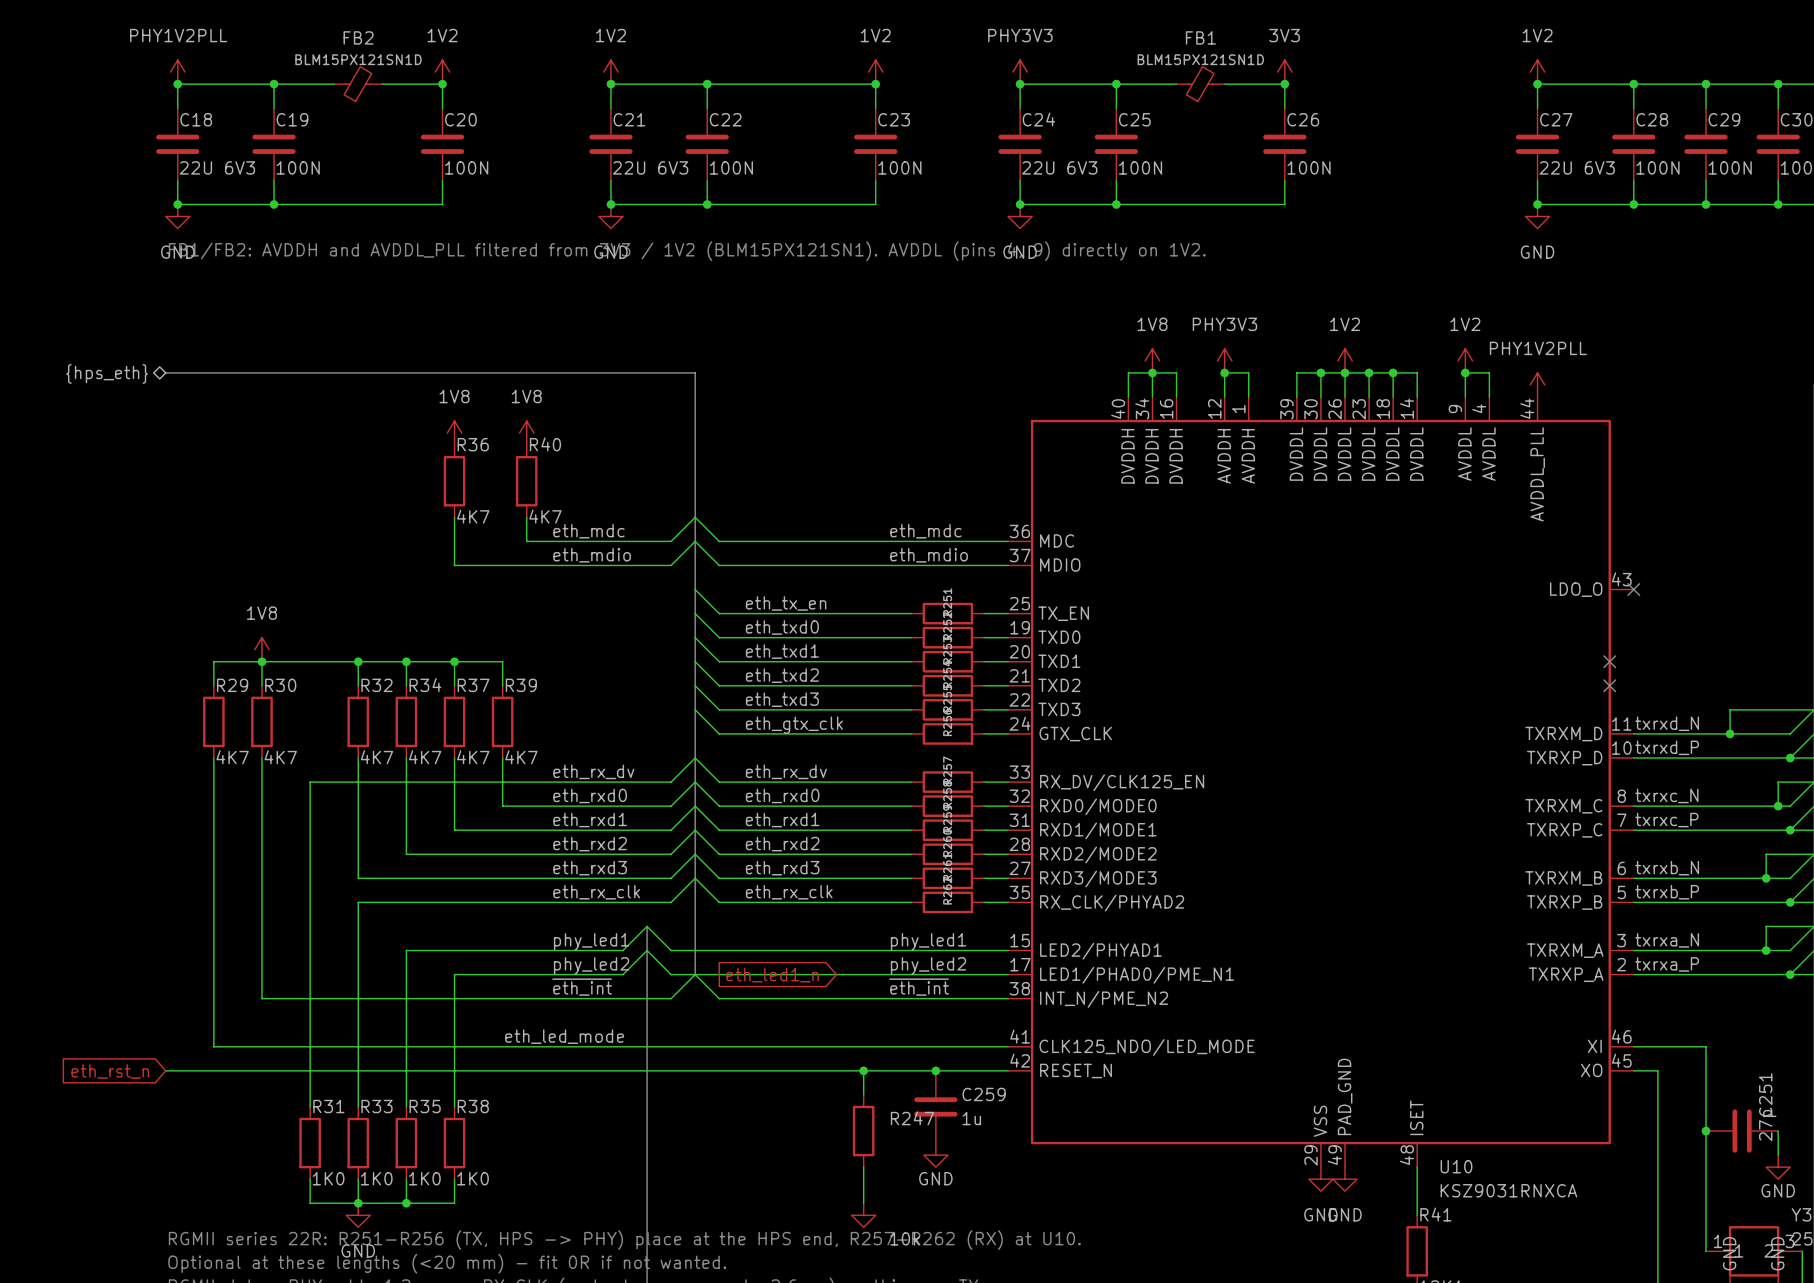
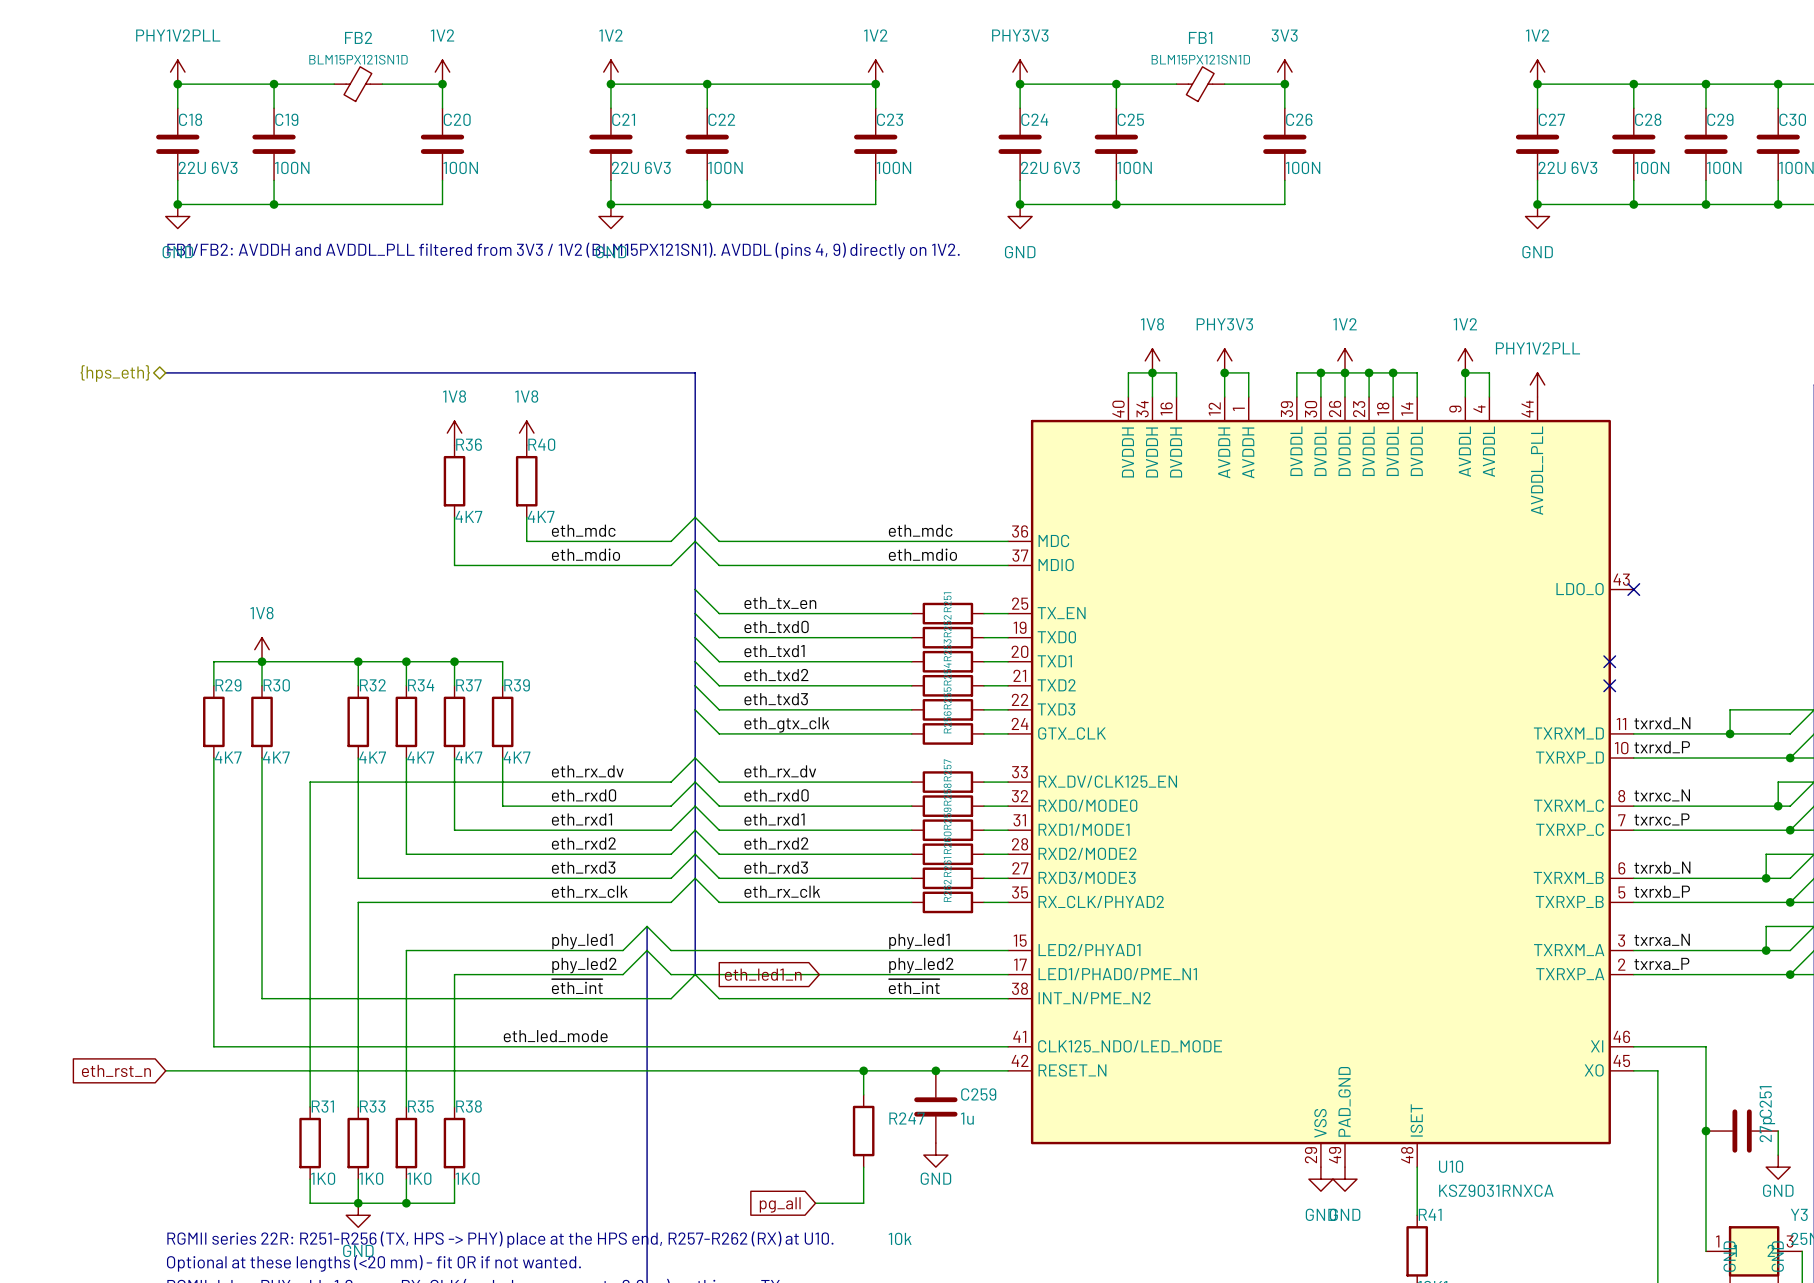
wire: none -> (815, 1203) (863, 1203)
global label: none -> pg_all (780, 1204)
power symbol: (863, 1215) -> none

